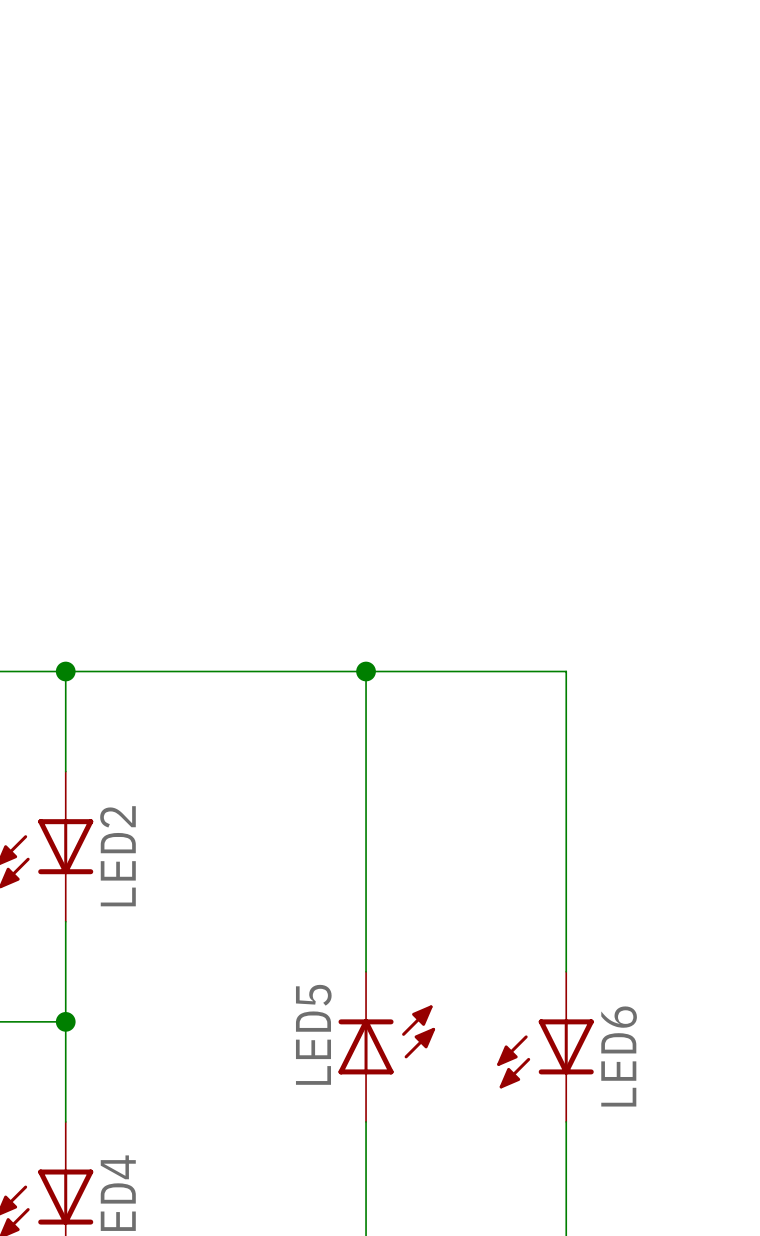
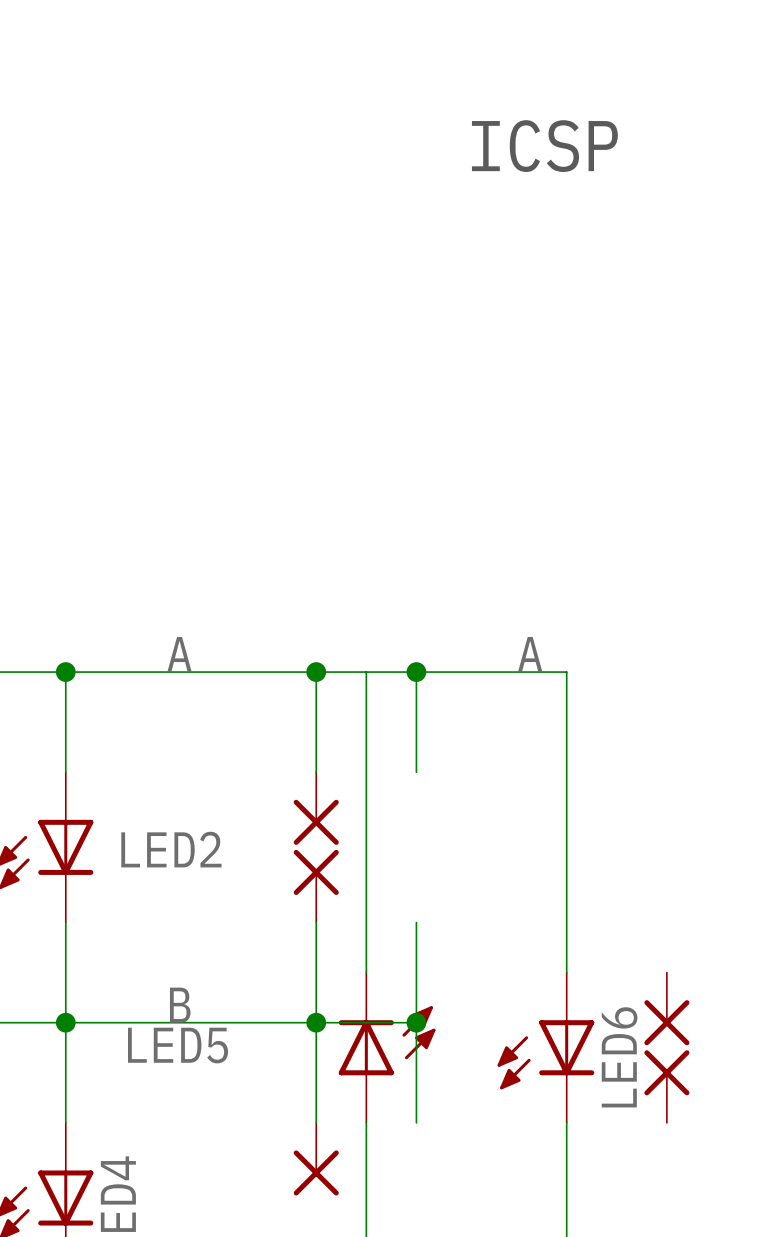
text: none -> ICSP (544, 146)
label: none -> A (179, 654)
label: none -> A (530, 654)
wire: none -> (316, 672) (316, 772)
junction: none -> (316, 672)
junction: (366, 671) -> none
wire: none -> (416, 672) (416, 772)
junction: none -> (416, 672)
part: none -> (316, 808)
LED2 name rotation: 0° (117, 856) -> 90° clockwise (171, 849)
part: none -> (316, 886)
wire: none -> (316, 922) (316, 1122)
wire: none -> (416, 922) (416, 1122)
label: none -> B (180, 1005)
part: none -> (666, 1008)
wire: none -> (65, 1022) (416, 1022)
junction: none -> (316, 1022)
junction: none -> (416, 1022)
LED5 name rotation: 0° (313, 1034) -> 90° clockwise (178, 1045)
LED5 name position: LED5 (313, 1034) -> LED5 (178, 1045)
part: none -> (666, 1086)
part: none -> (316, 1159)

